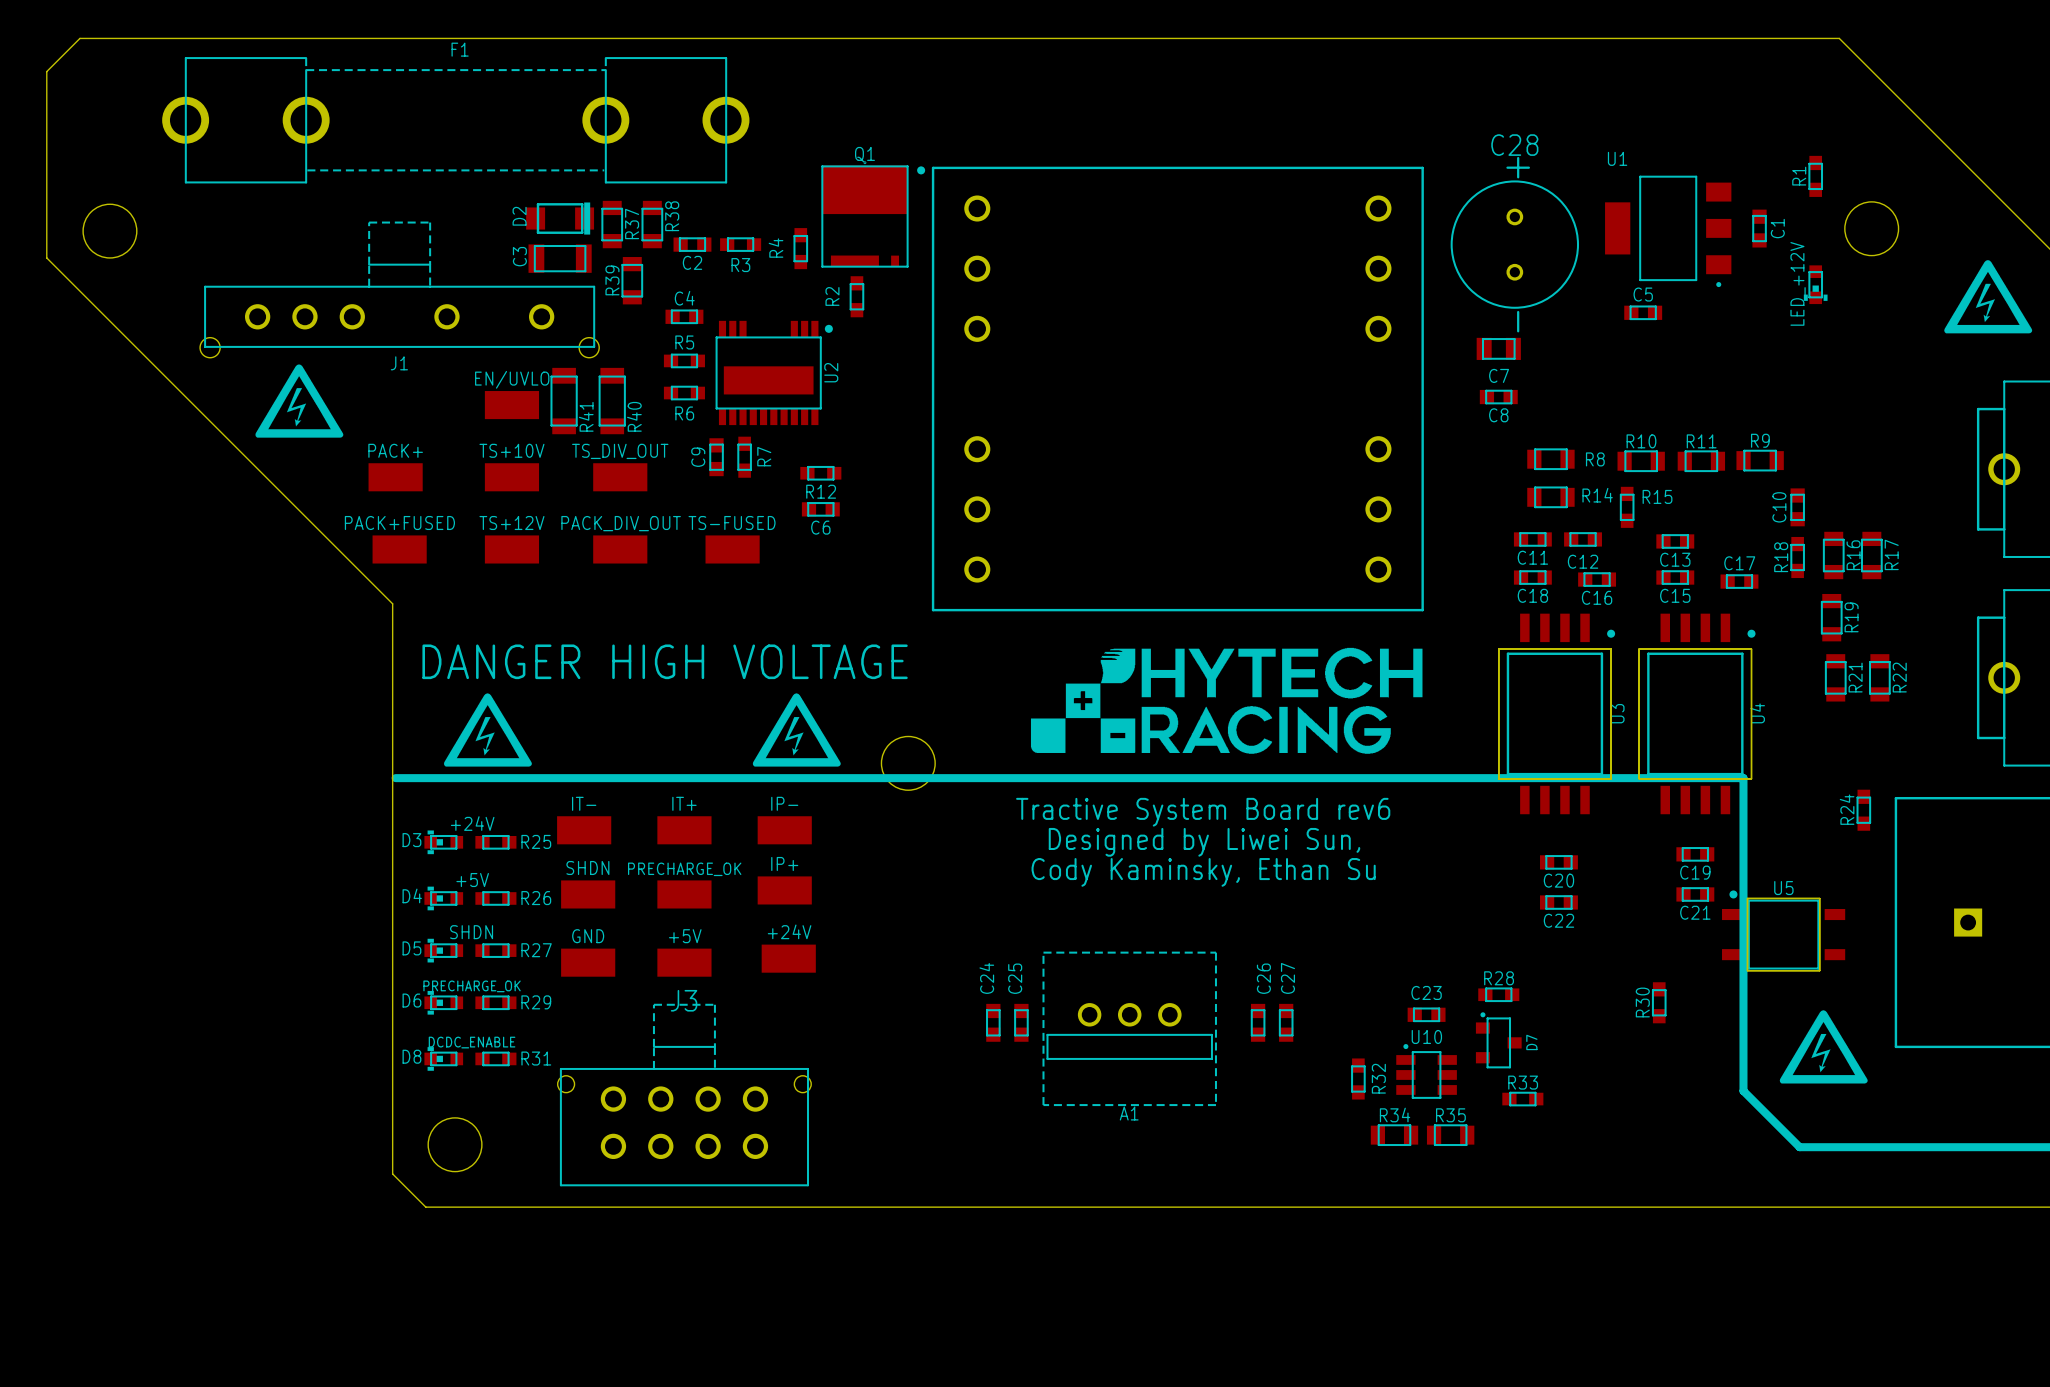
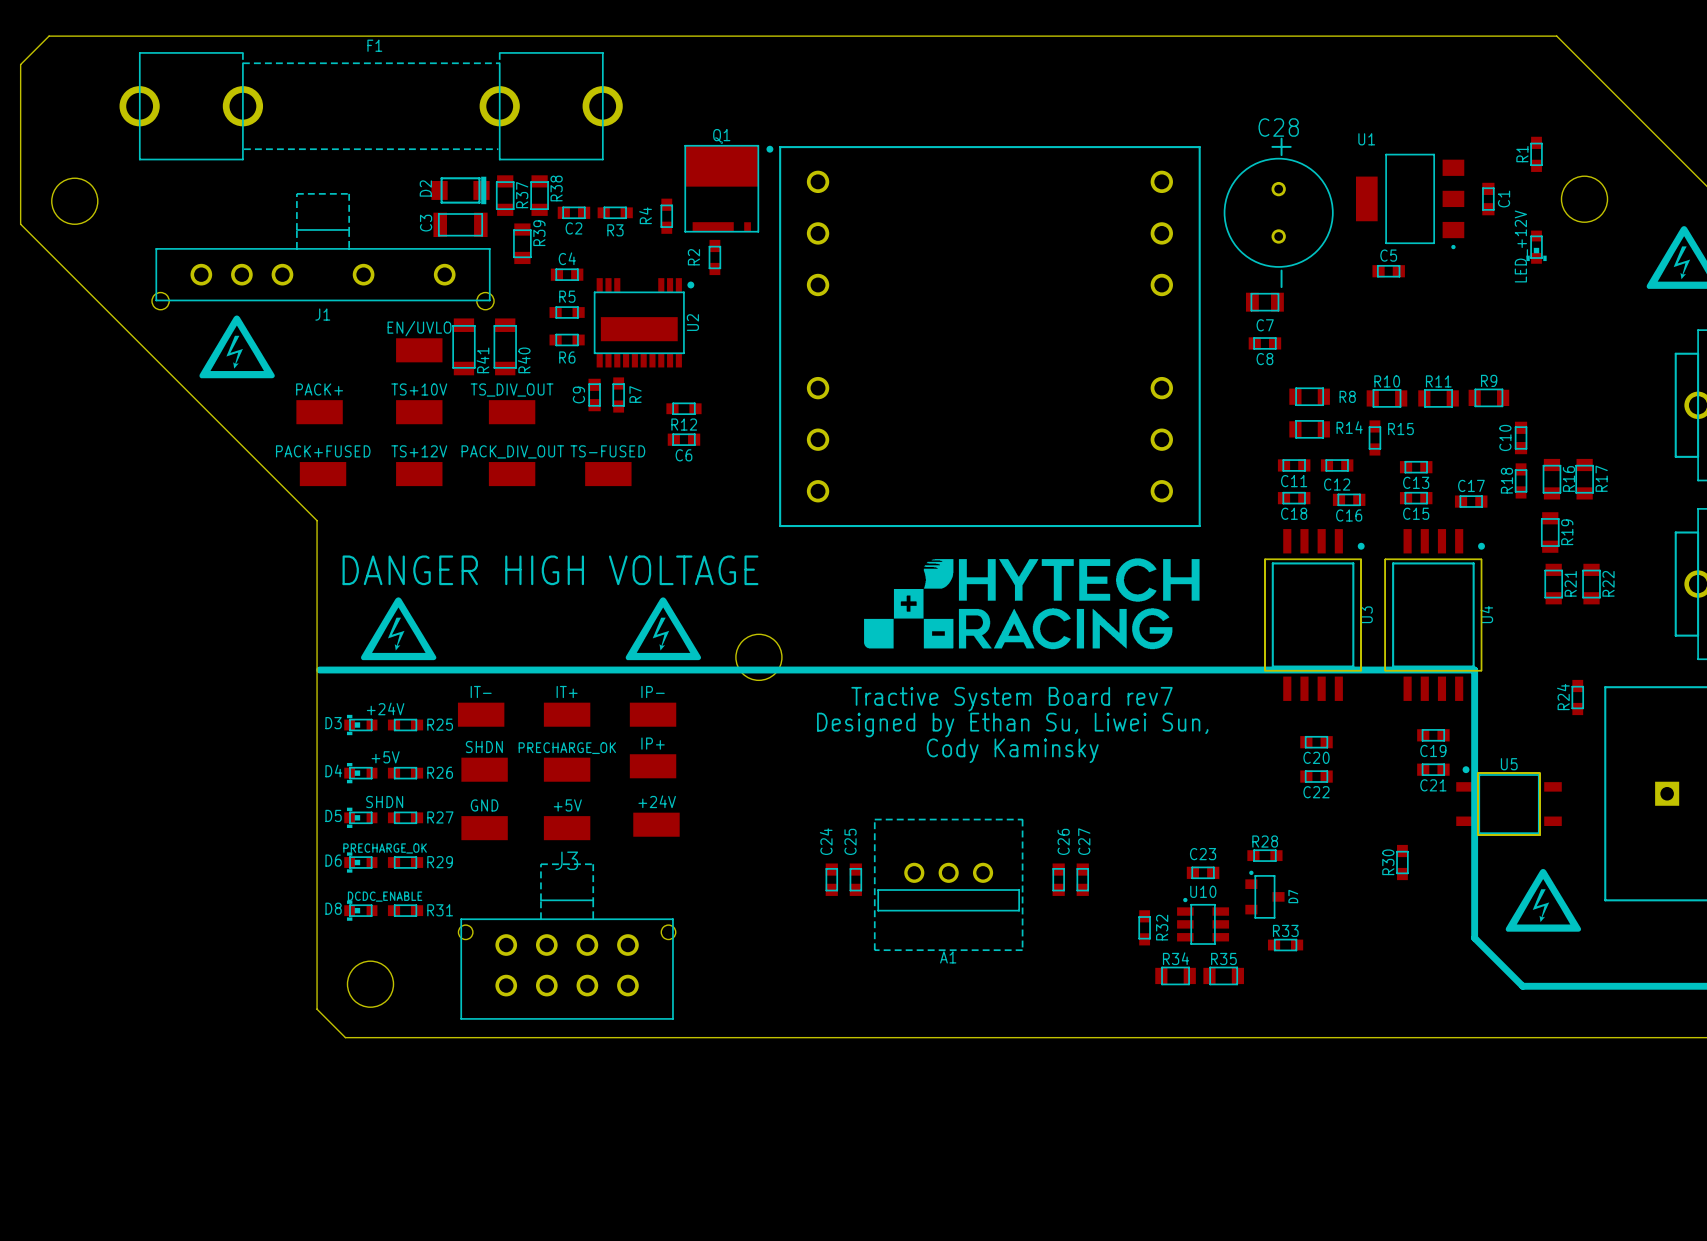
R39 name position: R39 (612, 280) -> R39 (539, 233)
text: Tractive System Board rev6 (1203, 812) -> Tractive System Board rev7 (1011, 699)
text: Designed by Liwei Sun, (1204, 842) -> Designed by Ethan Su, Liwei Sun, (1012, 725)
text: Cody Kaminsky, Ethan Su (1203, 872) -> Cody Kaminsky (1012, 750)

